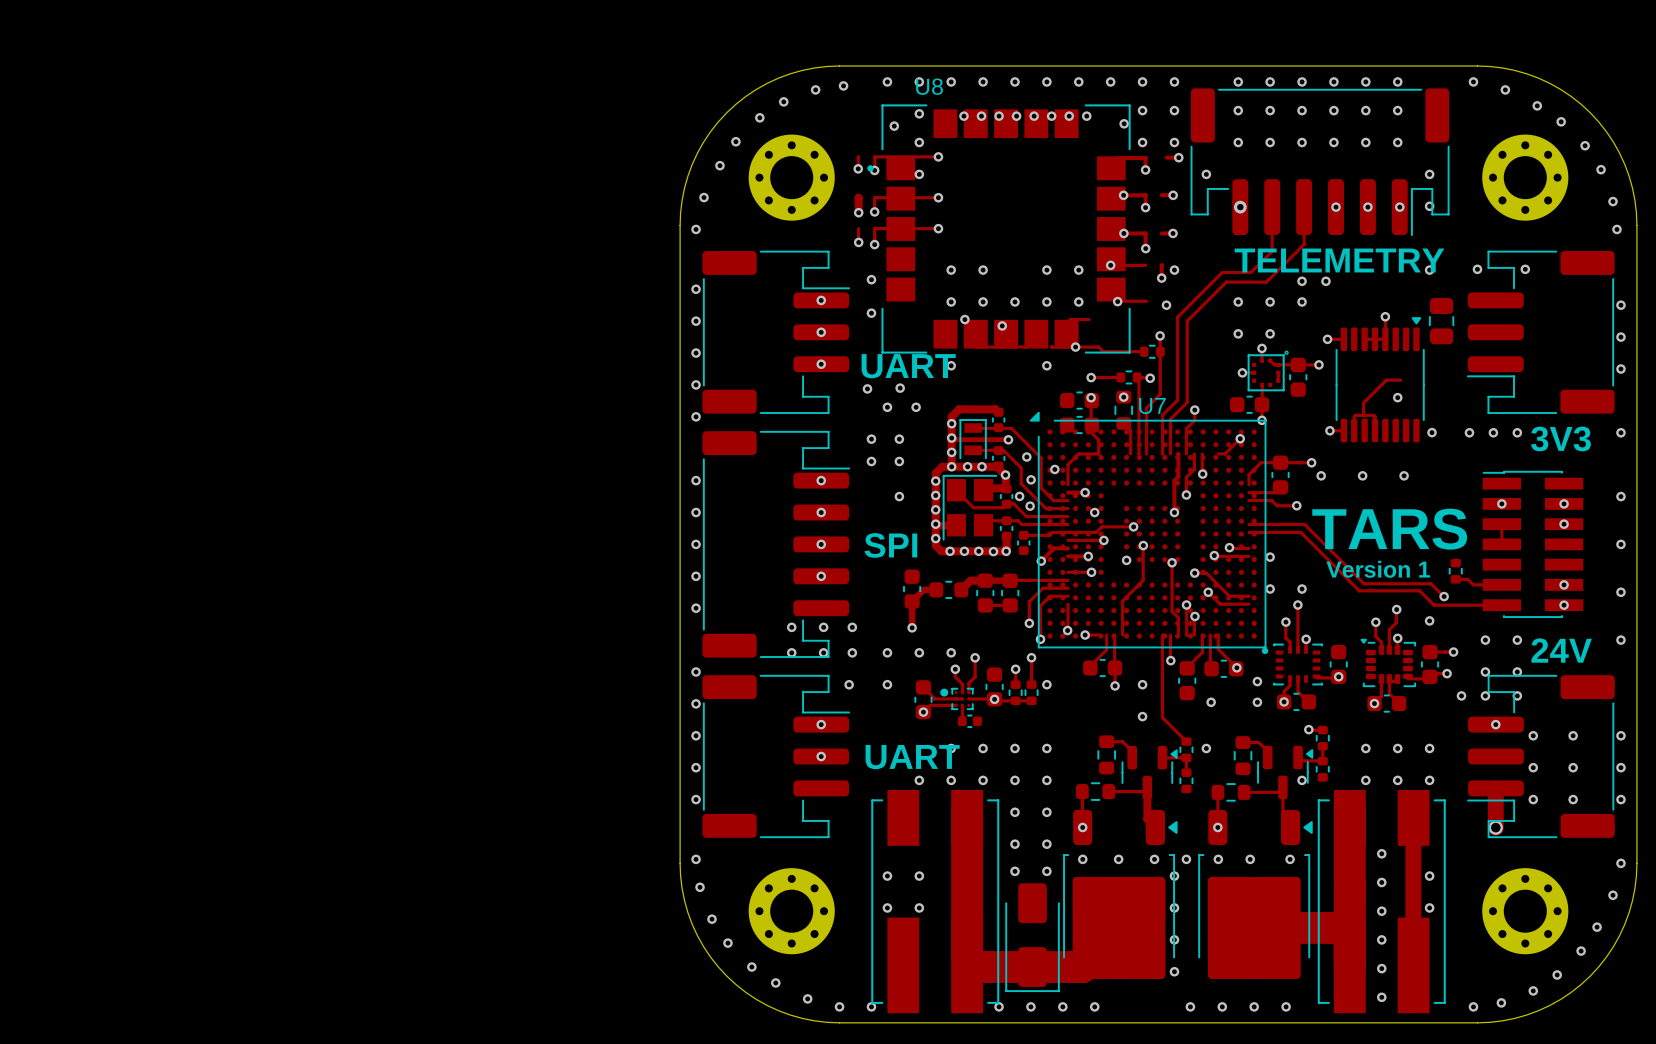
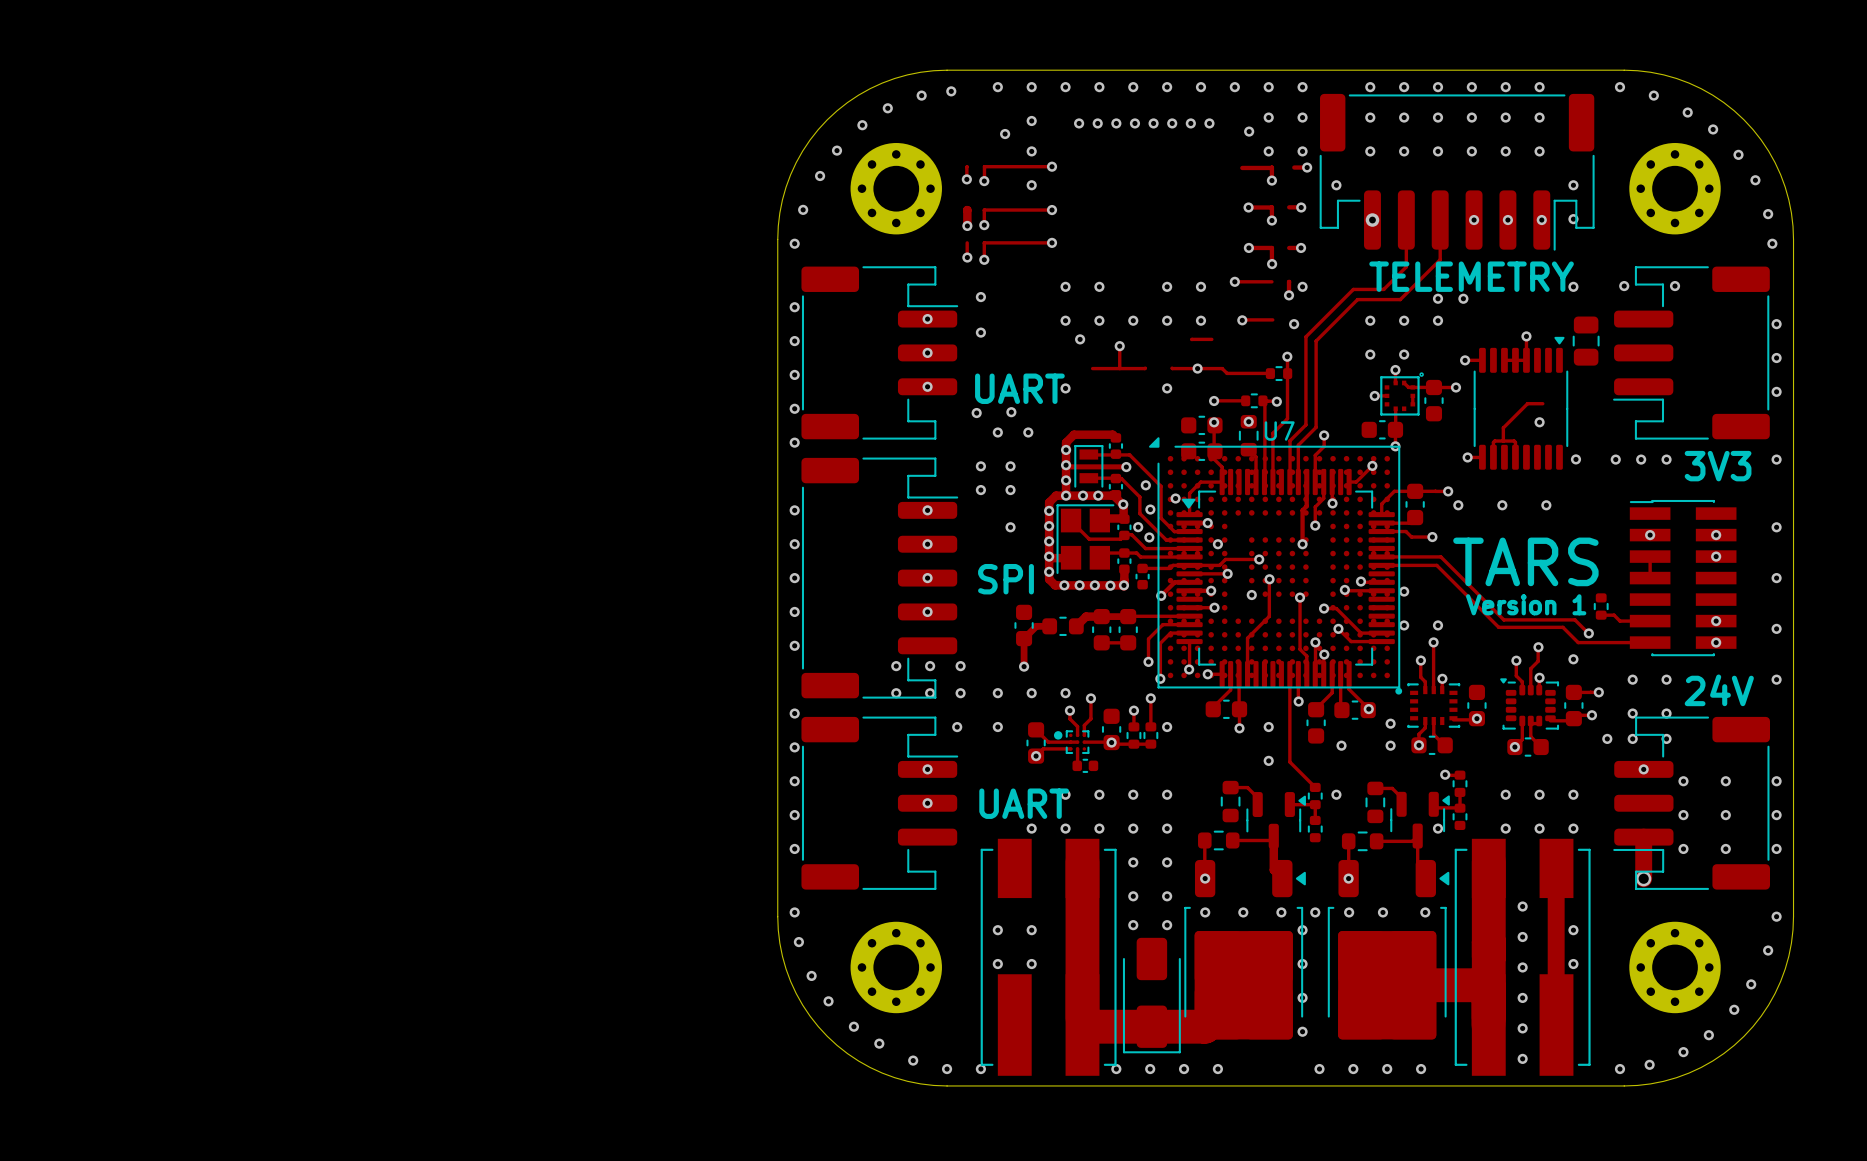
U8: (998, 228) -> none
part: none -> (1285, 578)

